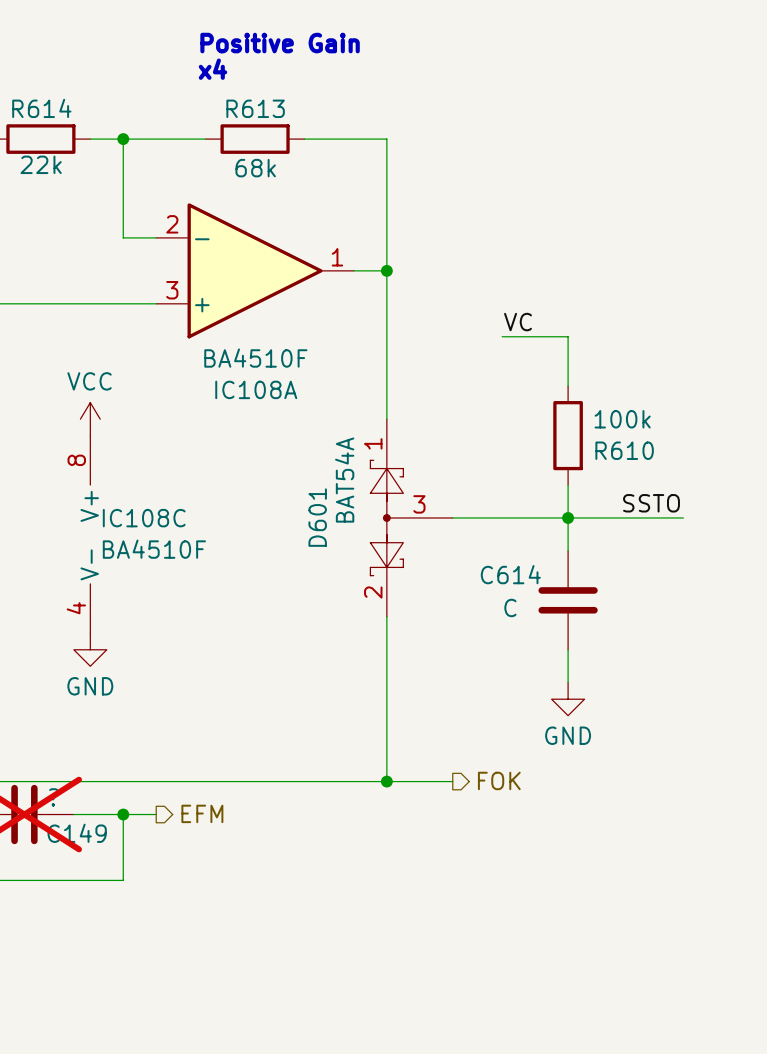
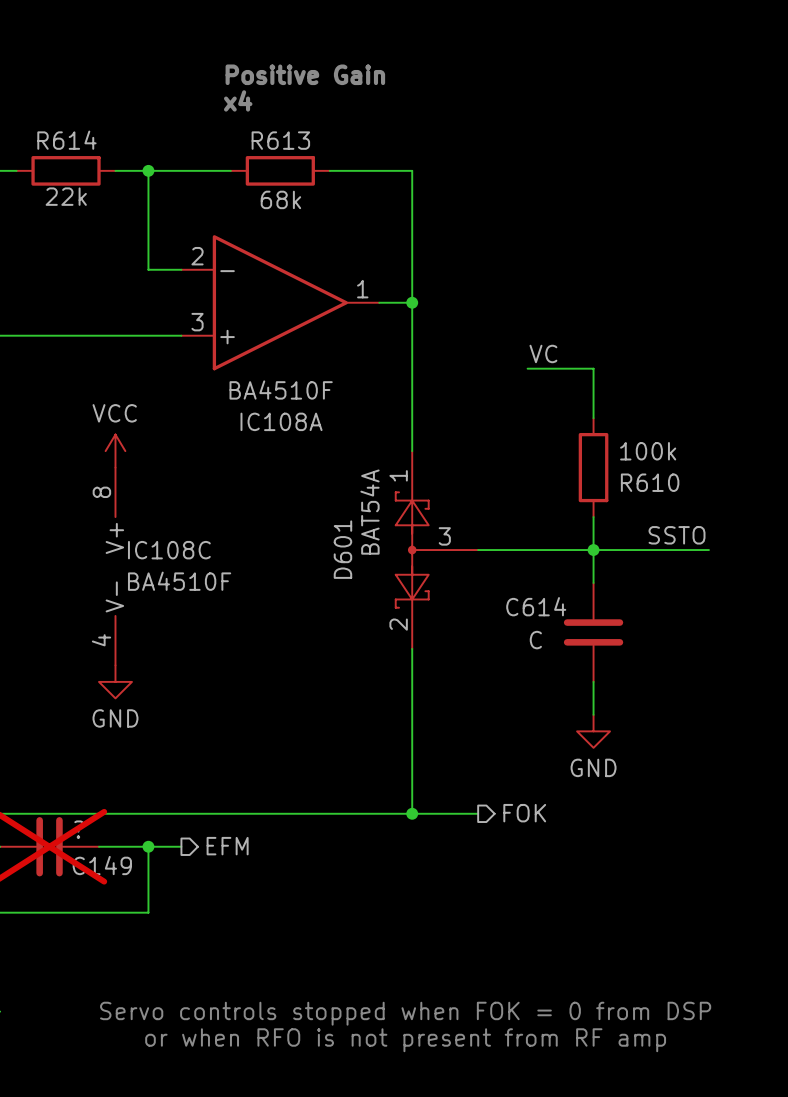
text: none -> Servo controls stopped when FOK = 0 from DSP (405, 1013)
text: none -> or when RFO is not present from RF amp (405, 1040)

